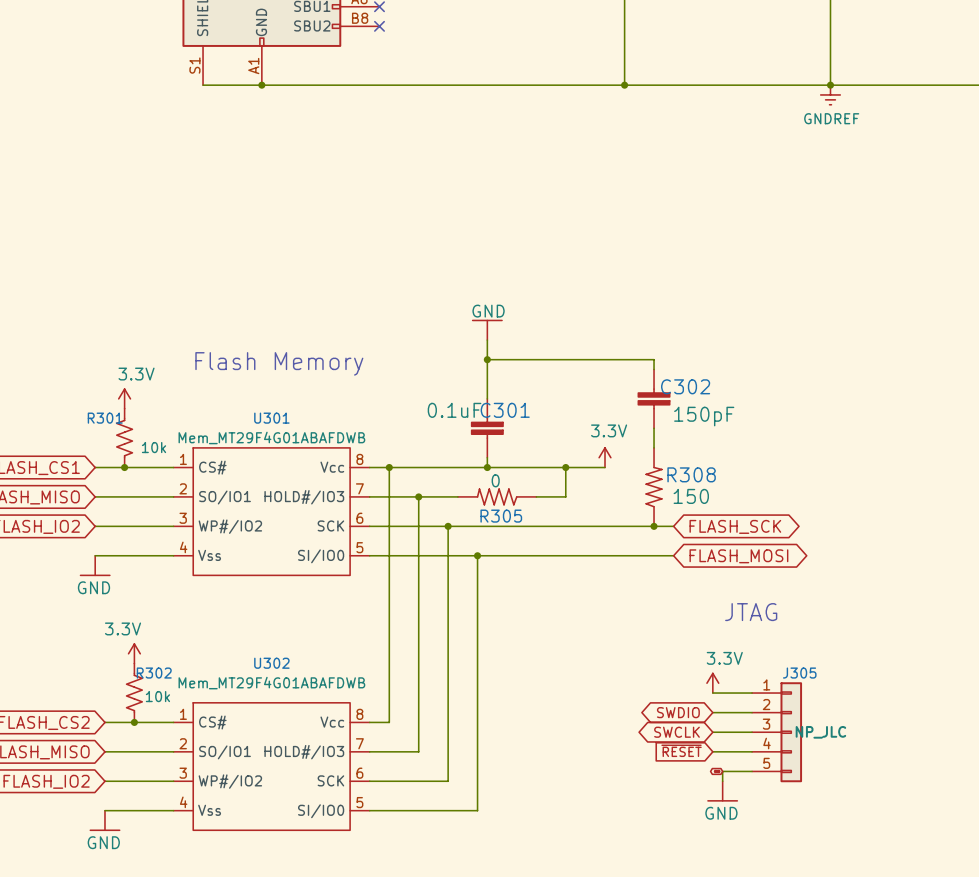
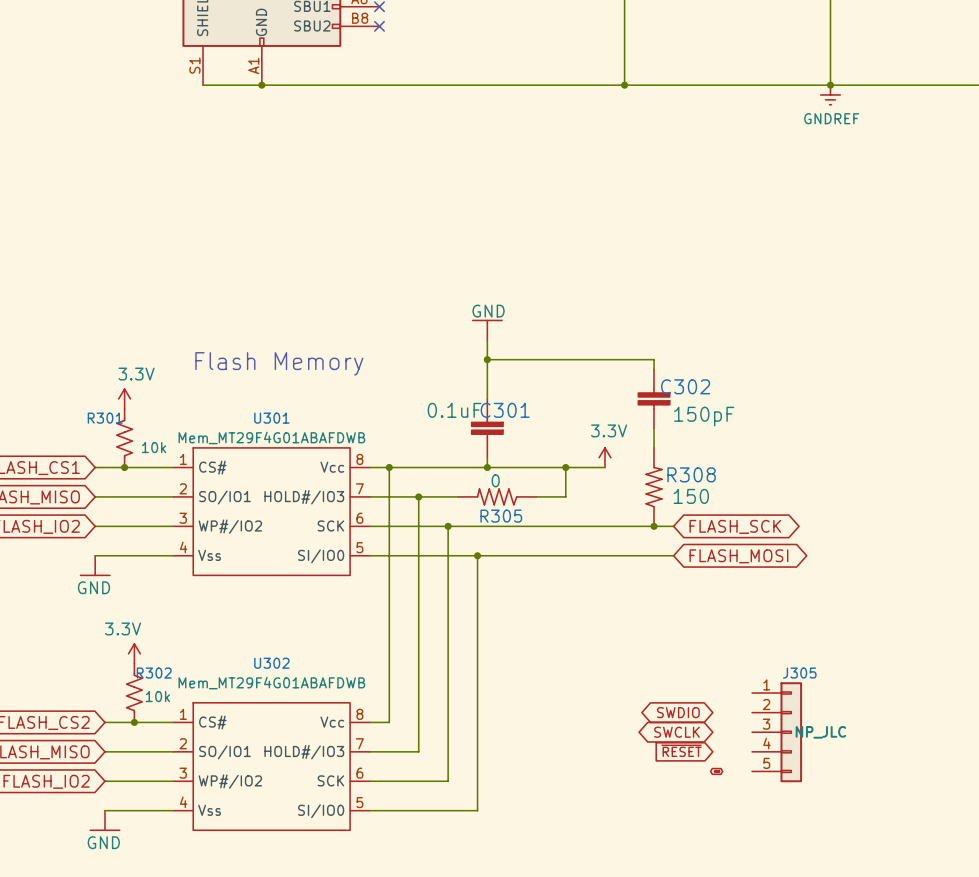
text: JTAG (751, 612) -> none
power symbol: 3.3V (712, 683) -> none
wire: (712, 693) (752, 693) -> none
wire: (712, 712) (752, 712) -> none
wire: (712, 732) (752, 732) -> none
wire: (712, 751) (752, 751) -> none
wire: (752, 771) (722, 771) (722, 781) -> none
power symbol: GND (722, 791) -> none

